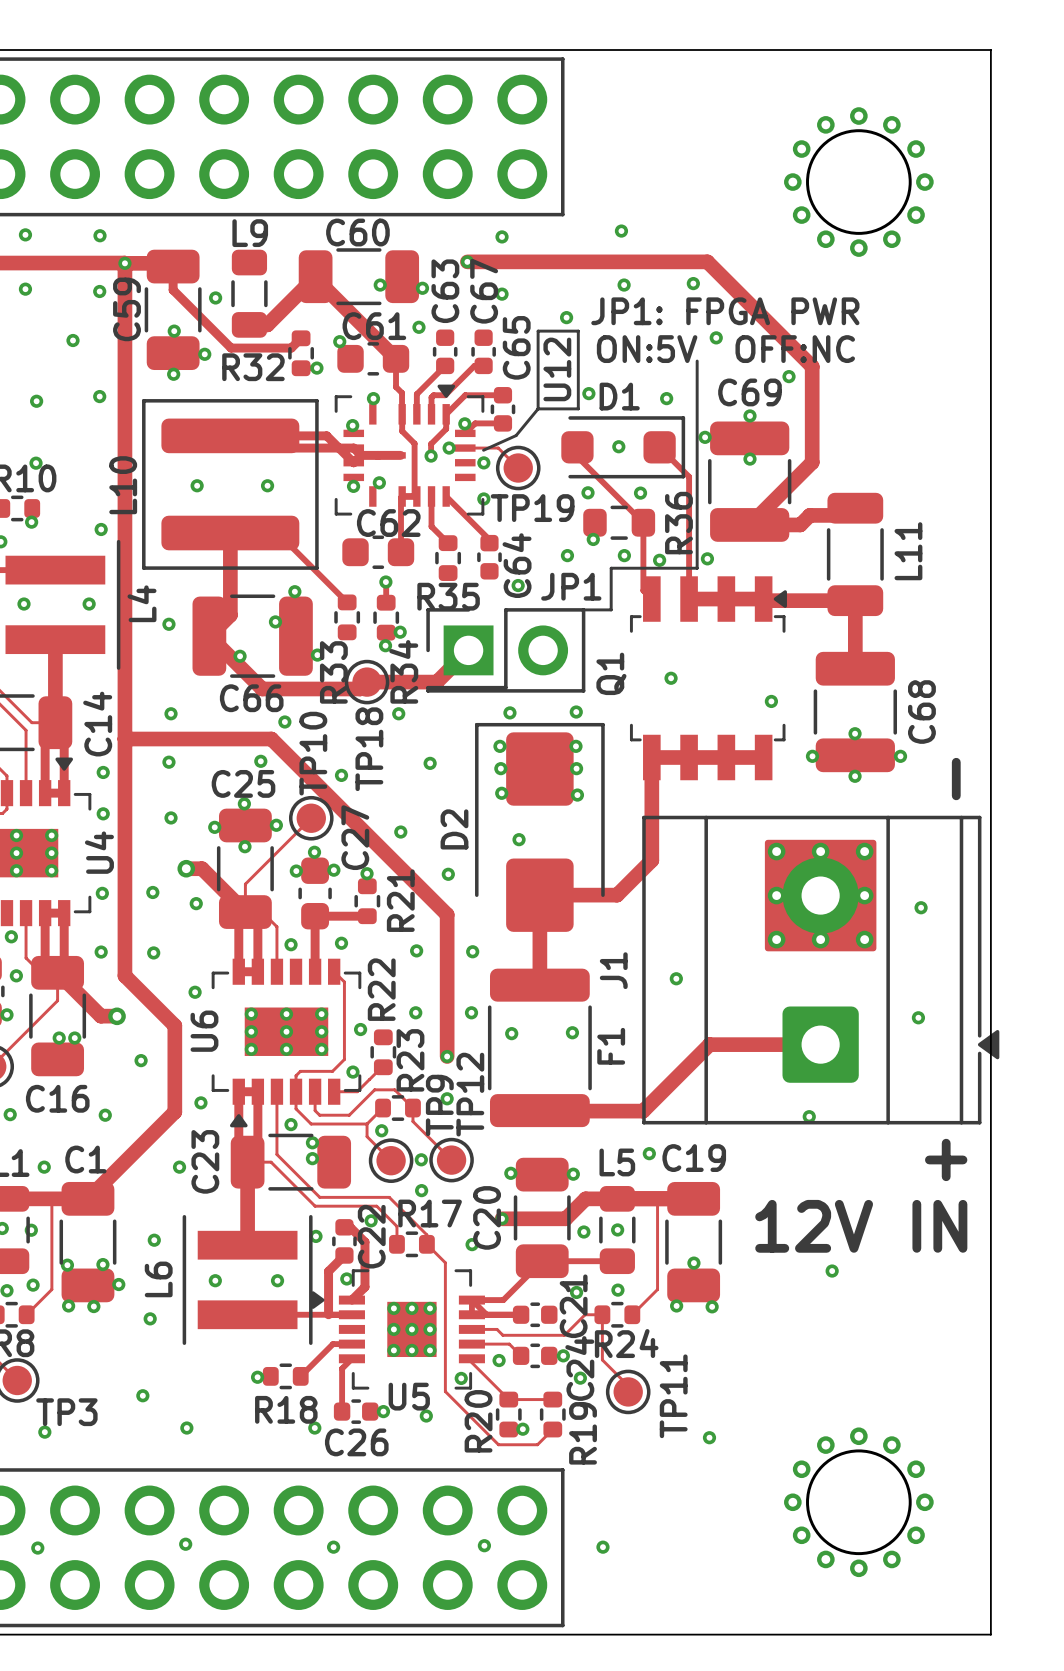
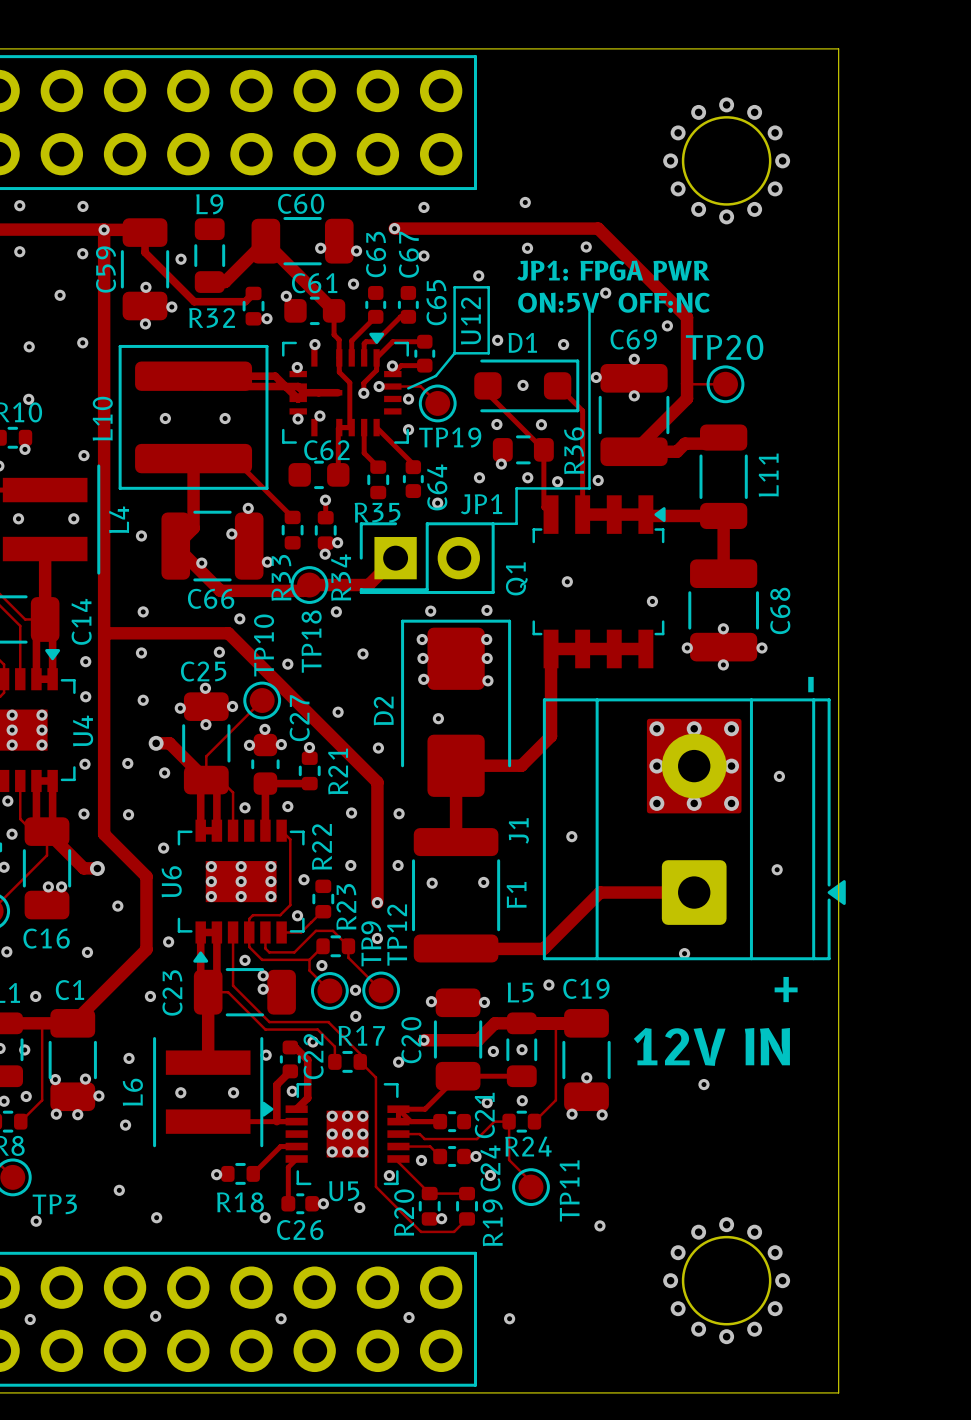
track: none -> (687, 383) (725, 384)
TP20: none -> (725, 384)

